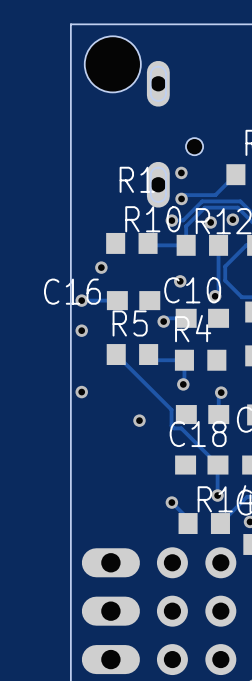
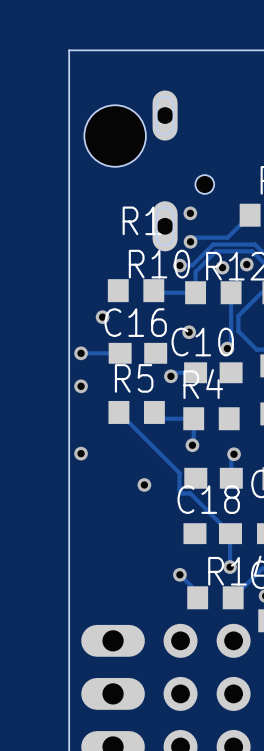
hole position: (112, 64) -> (115, 136)
C16 name position: C16 (72, 291) -> C16 (135, 322)

